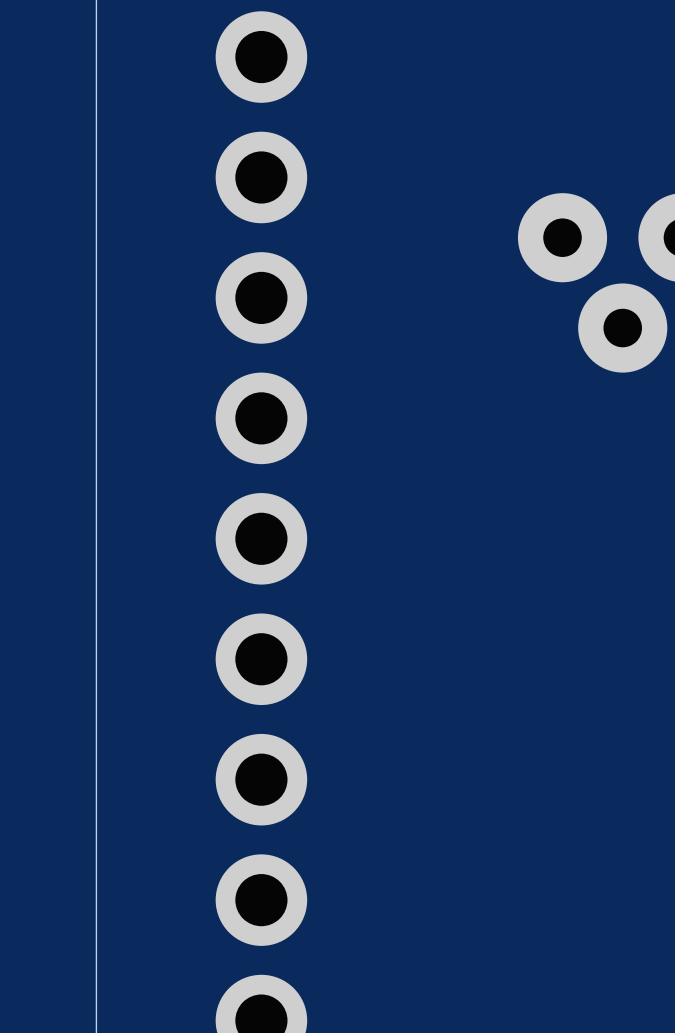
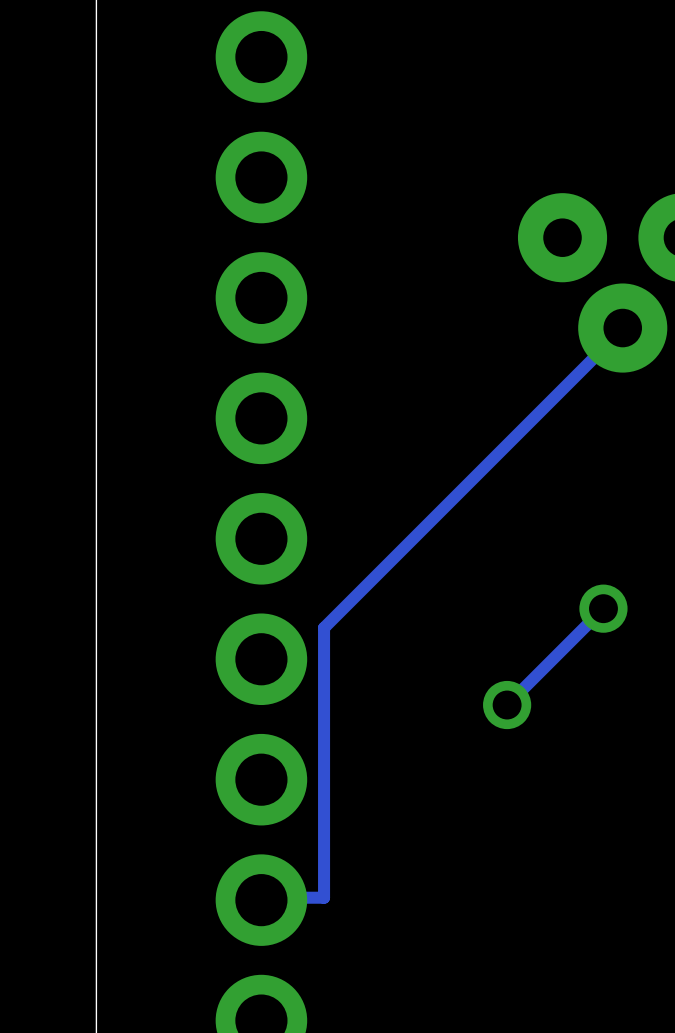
track: none -> (622, 328) (324, 627) (324, 897) (266, 897) (261, 900)
track: none -> (603, 608) (507, 705)
via: none -> (603, 608)
via: none -> (507, 705)

